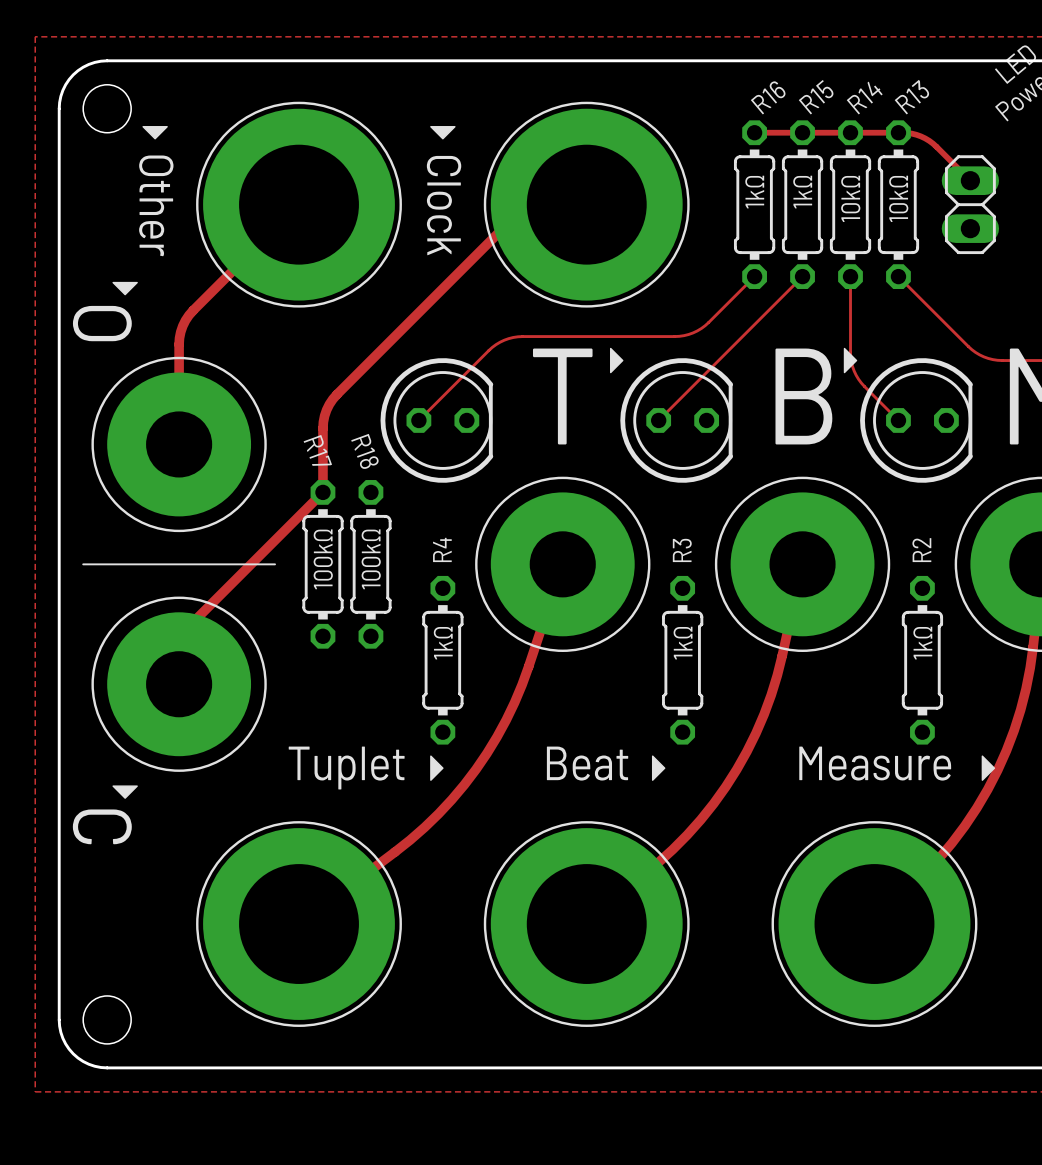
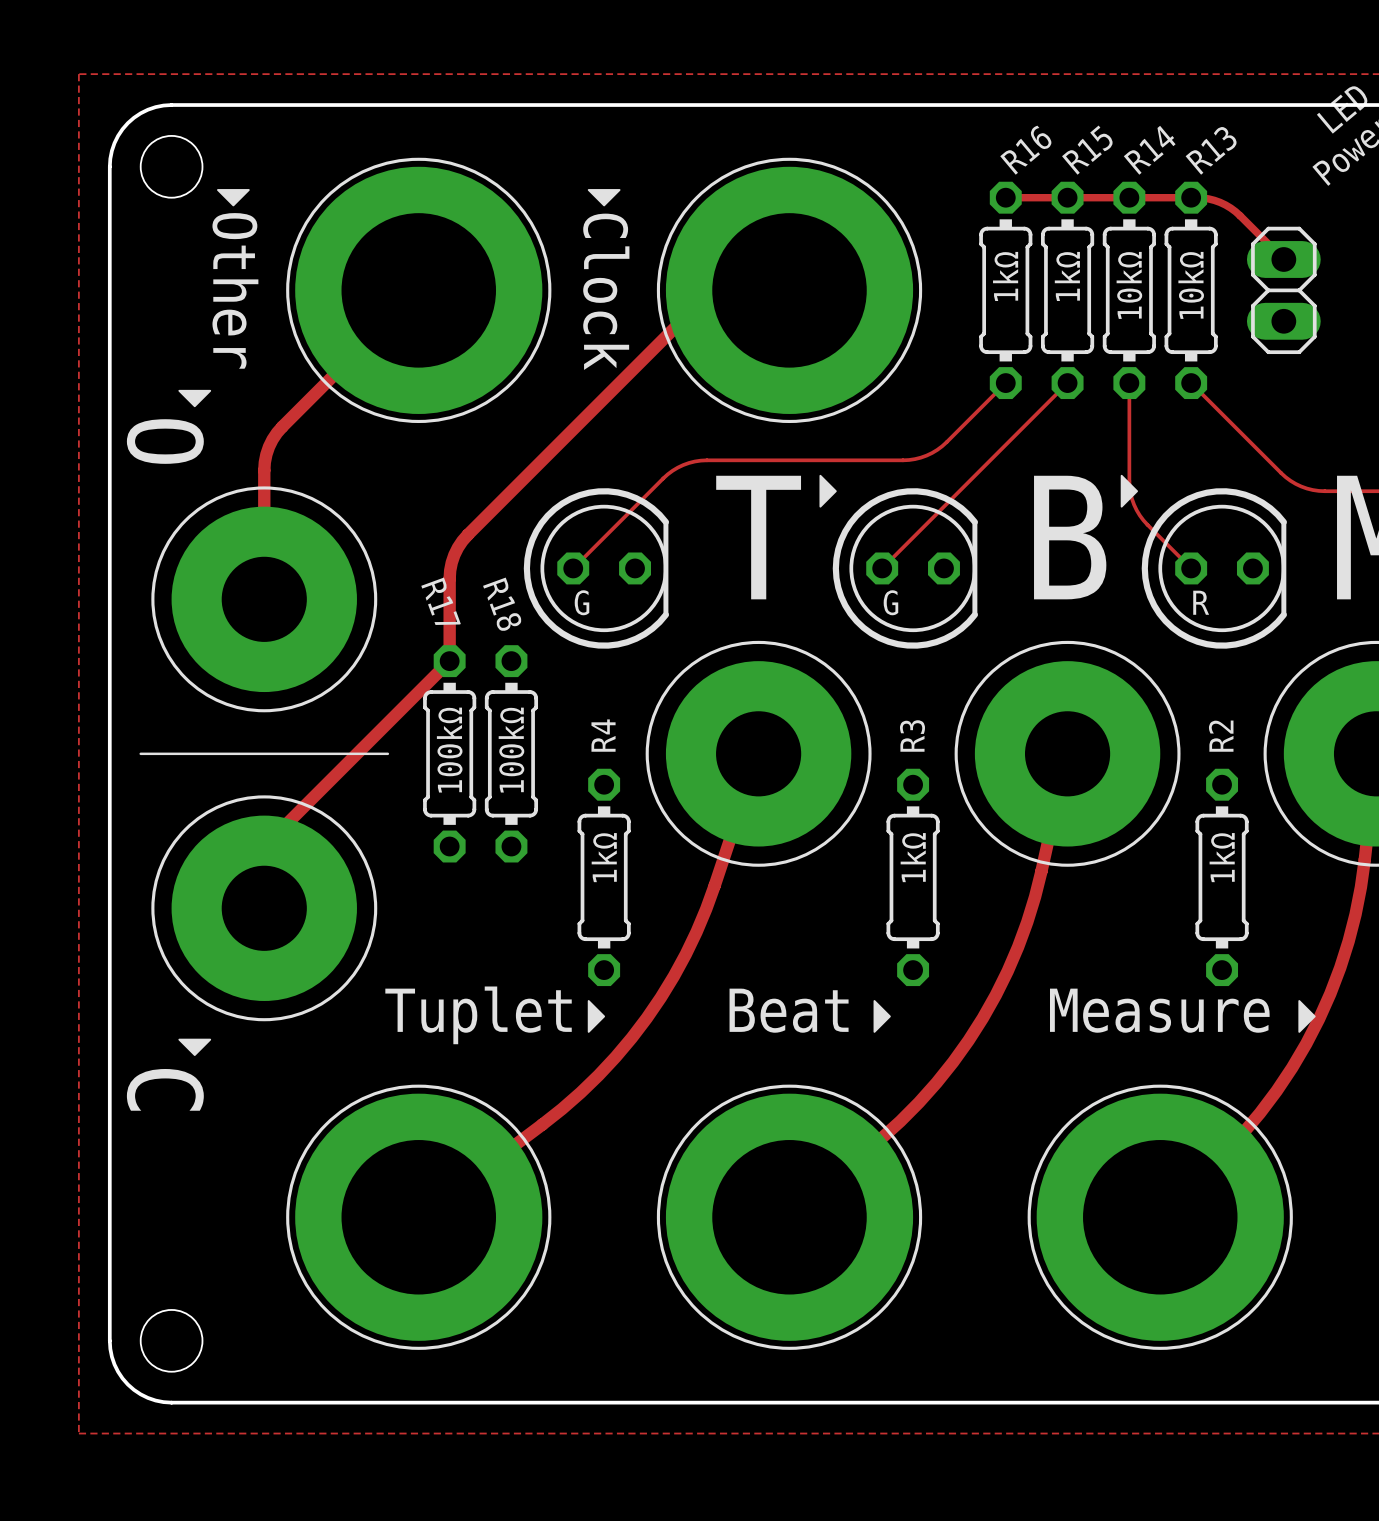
text: none -> G (582, 602)
text: none -> G (890, 602)
text: none -> R (1201, 602)

